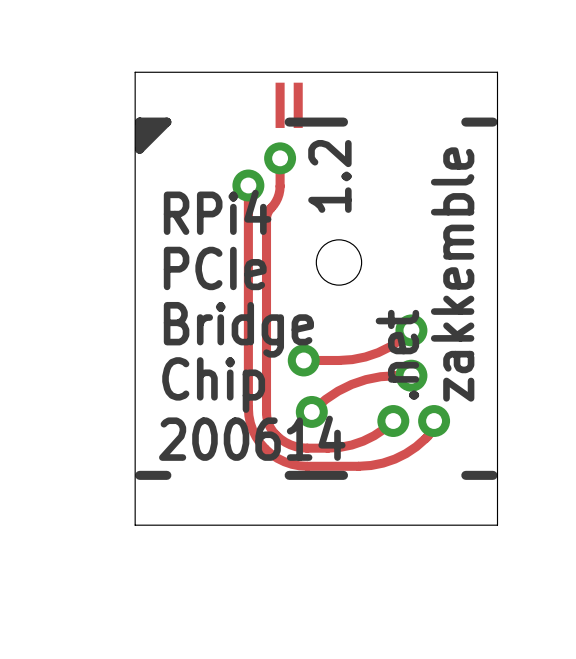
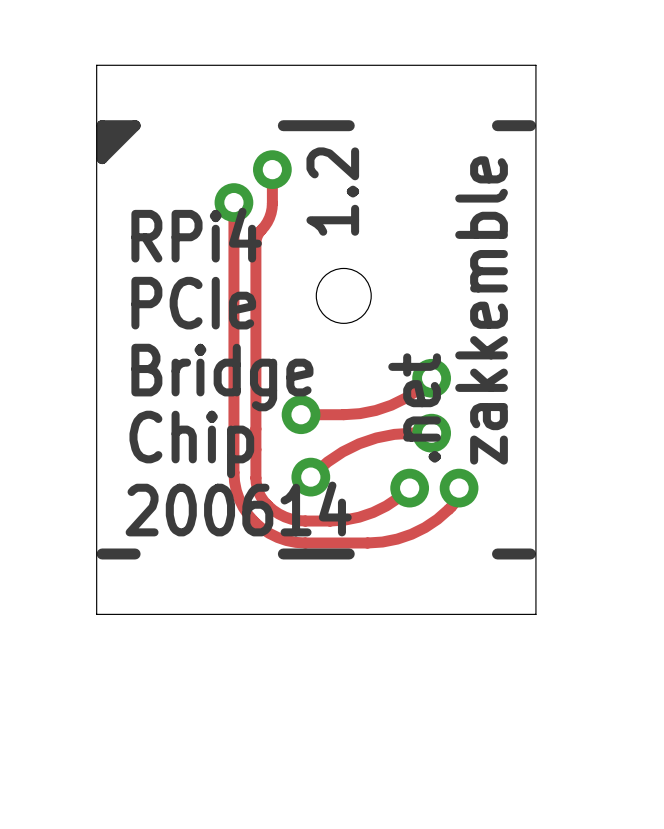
part: (280, 105) -> none
part: (298, 105) -> none

